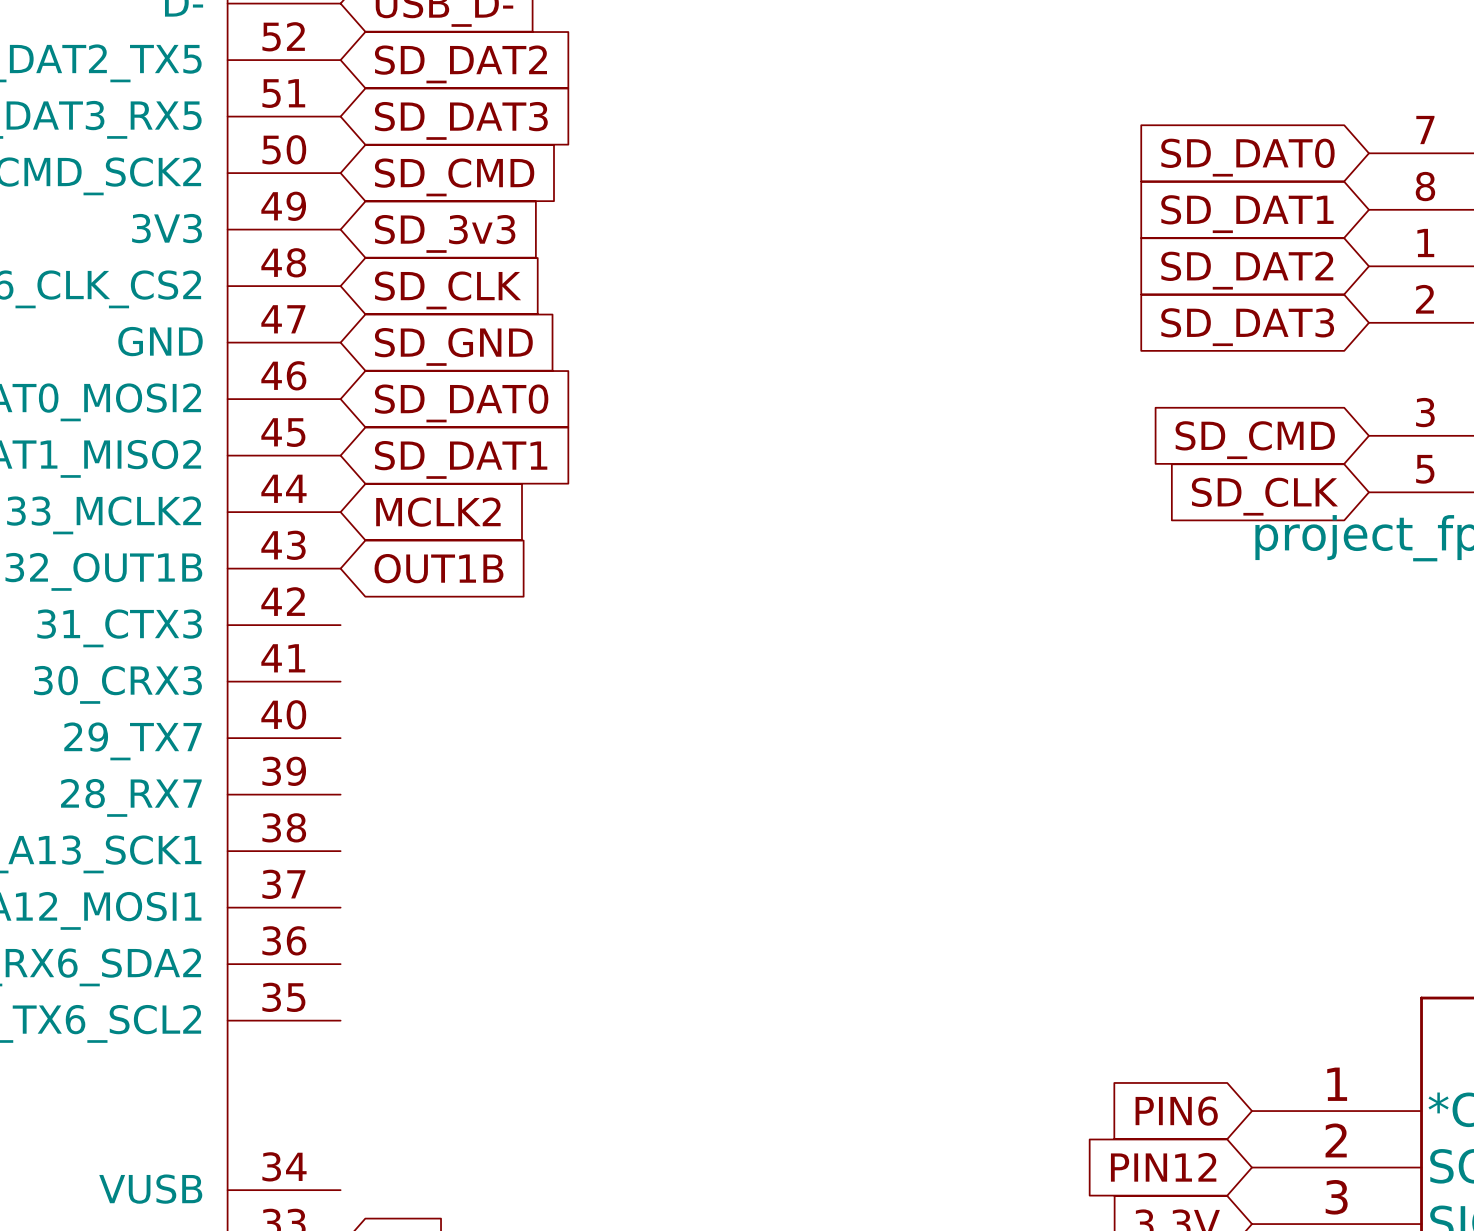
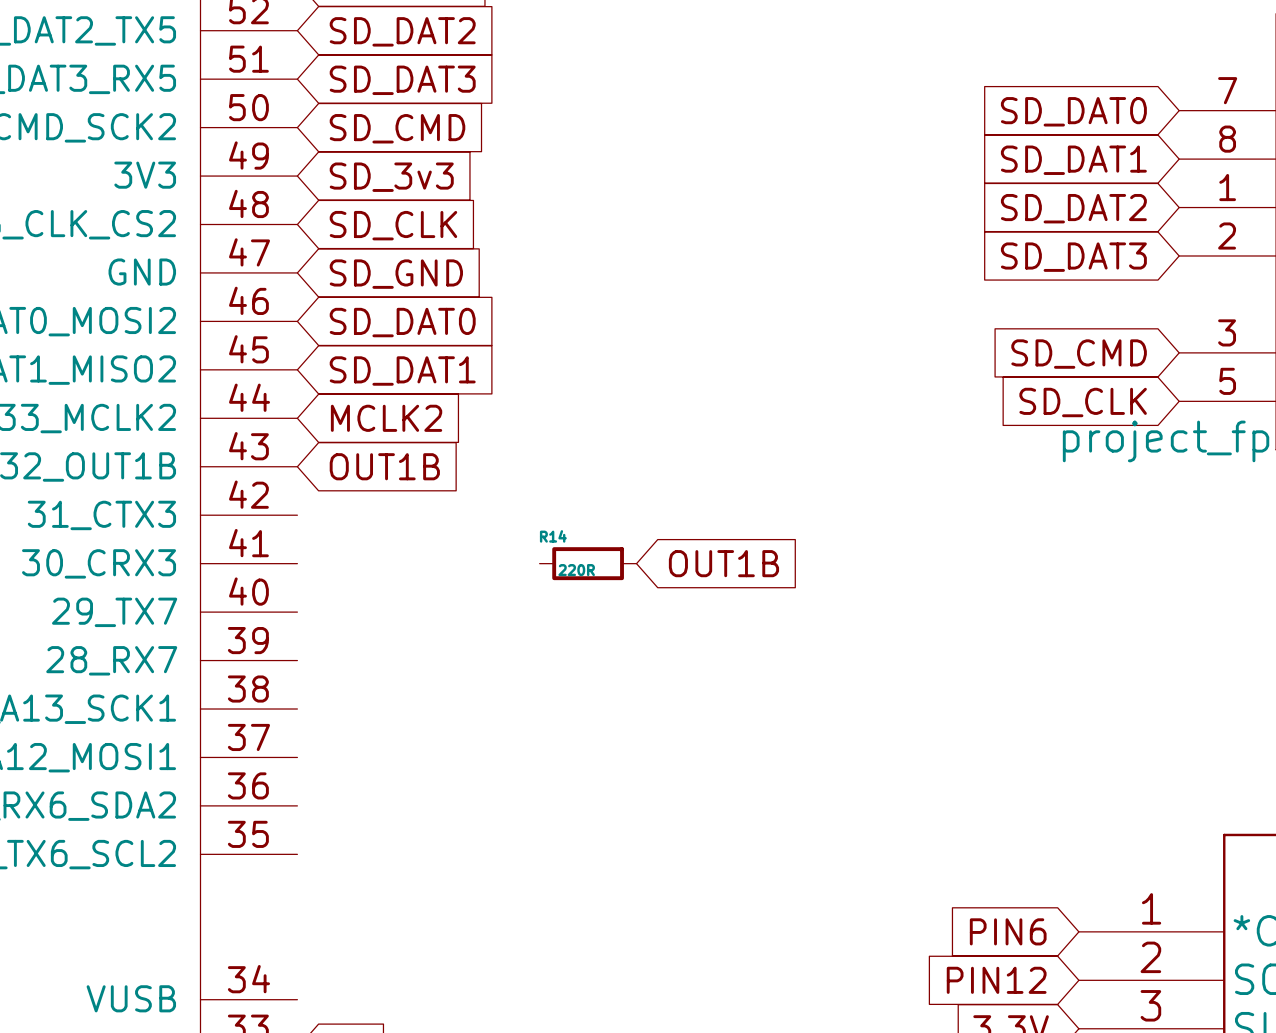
R14: none -> 220R (588, 563)
global label: none -> OUT1B (723, 563)

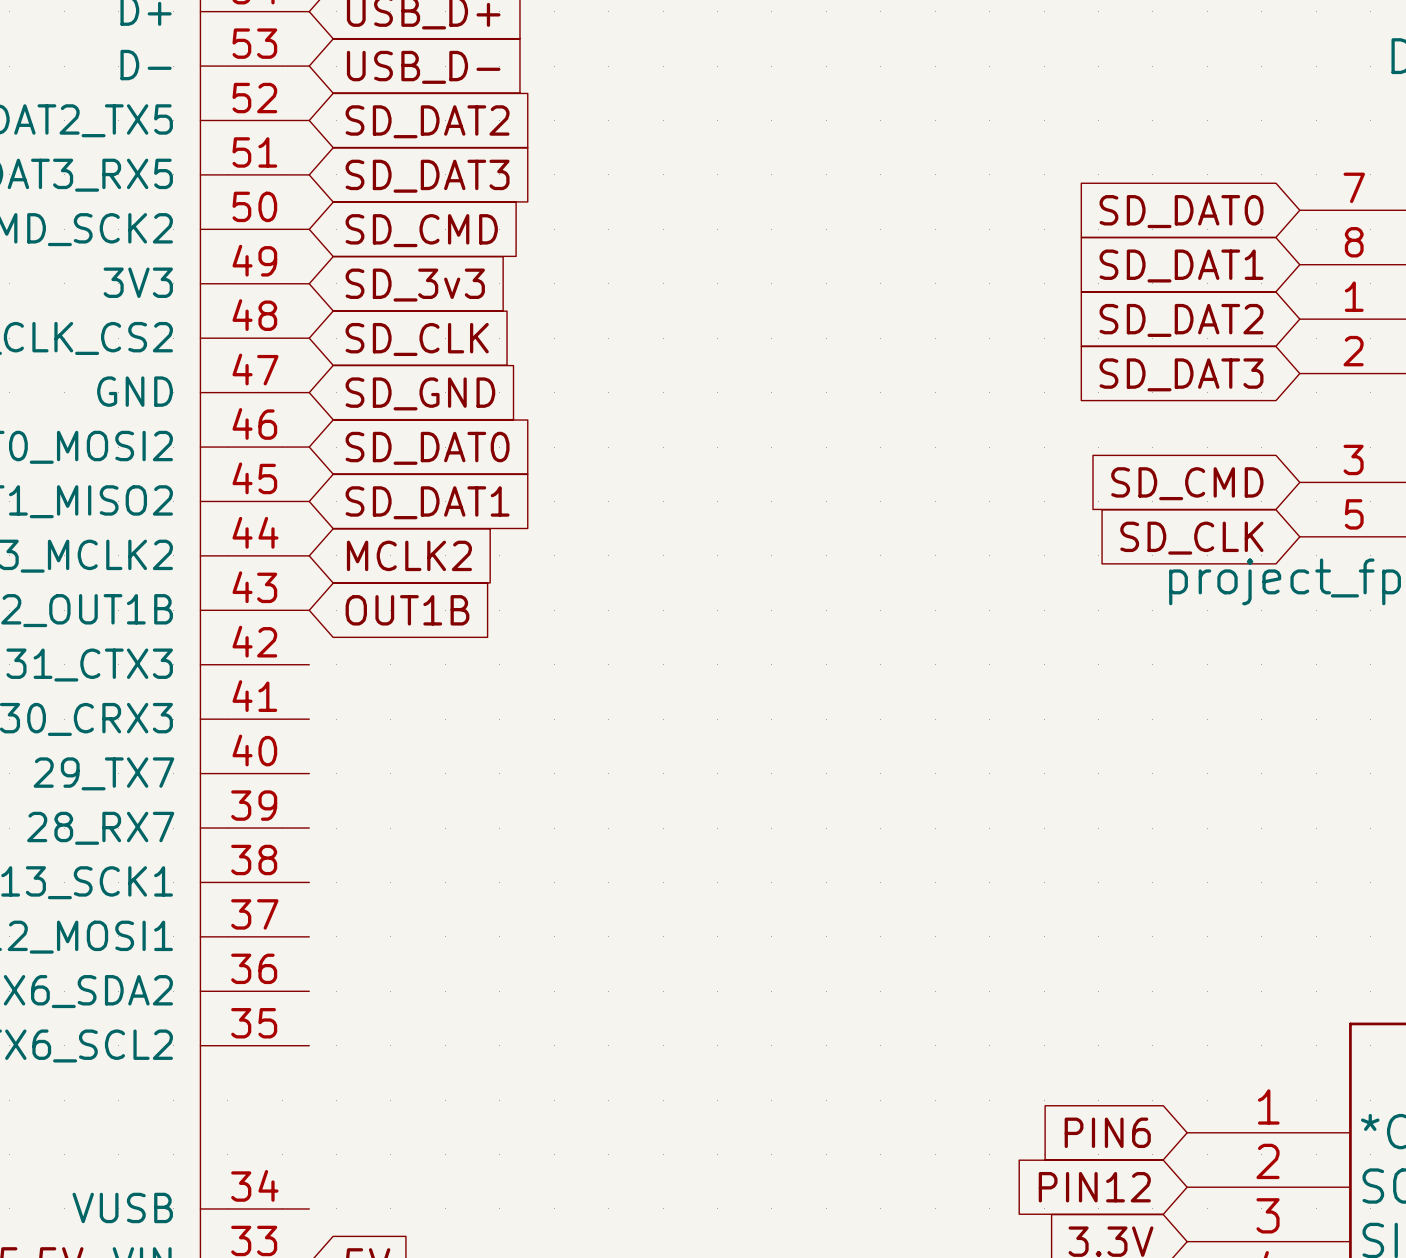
R14: 220R (588, 563) -> none
global label: OUT1B (723, 563) -> none

